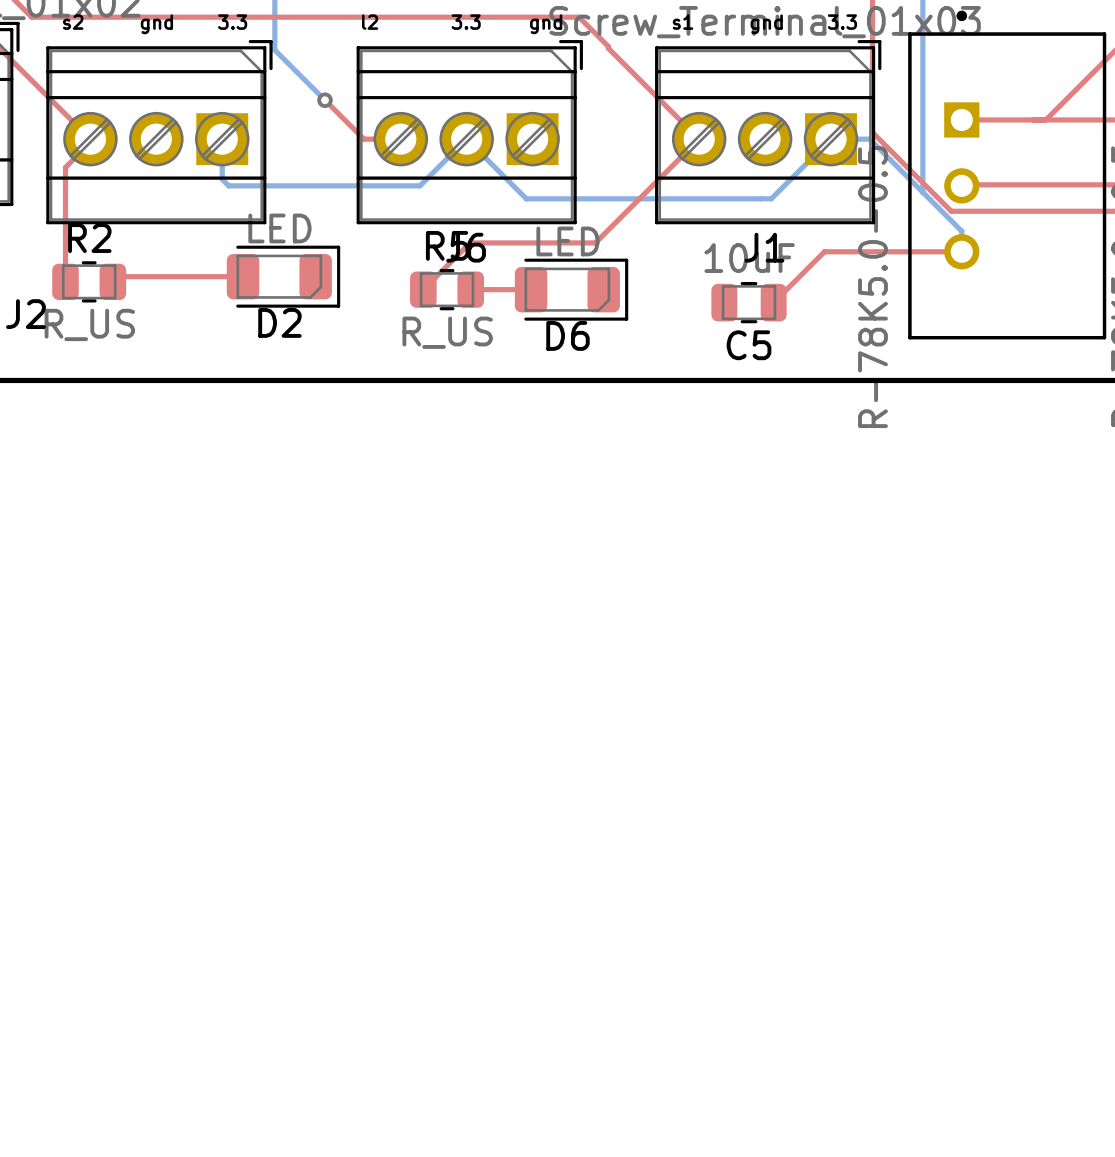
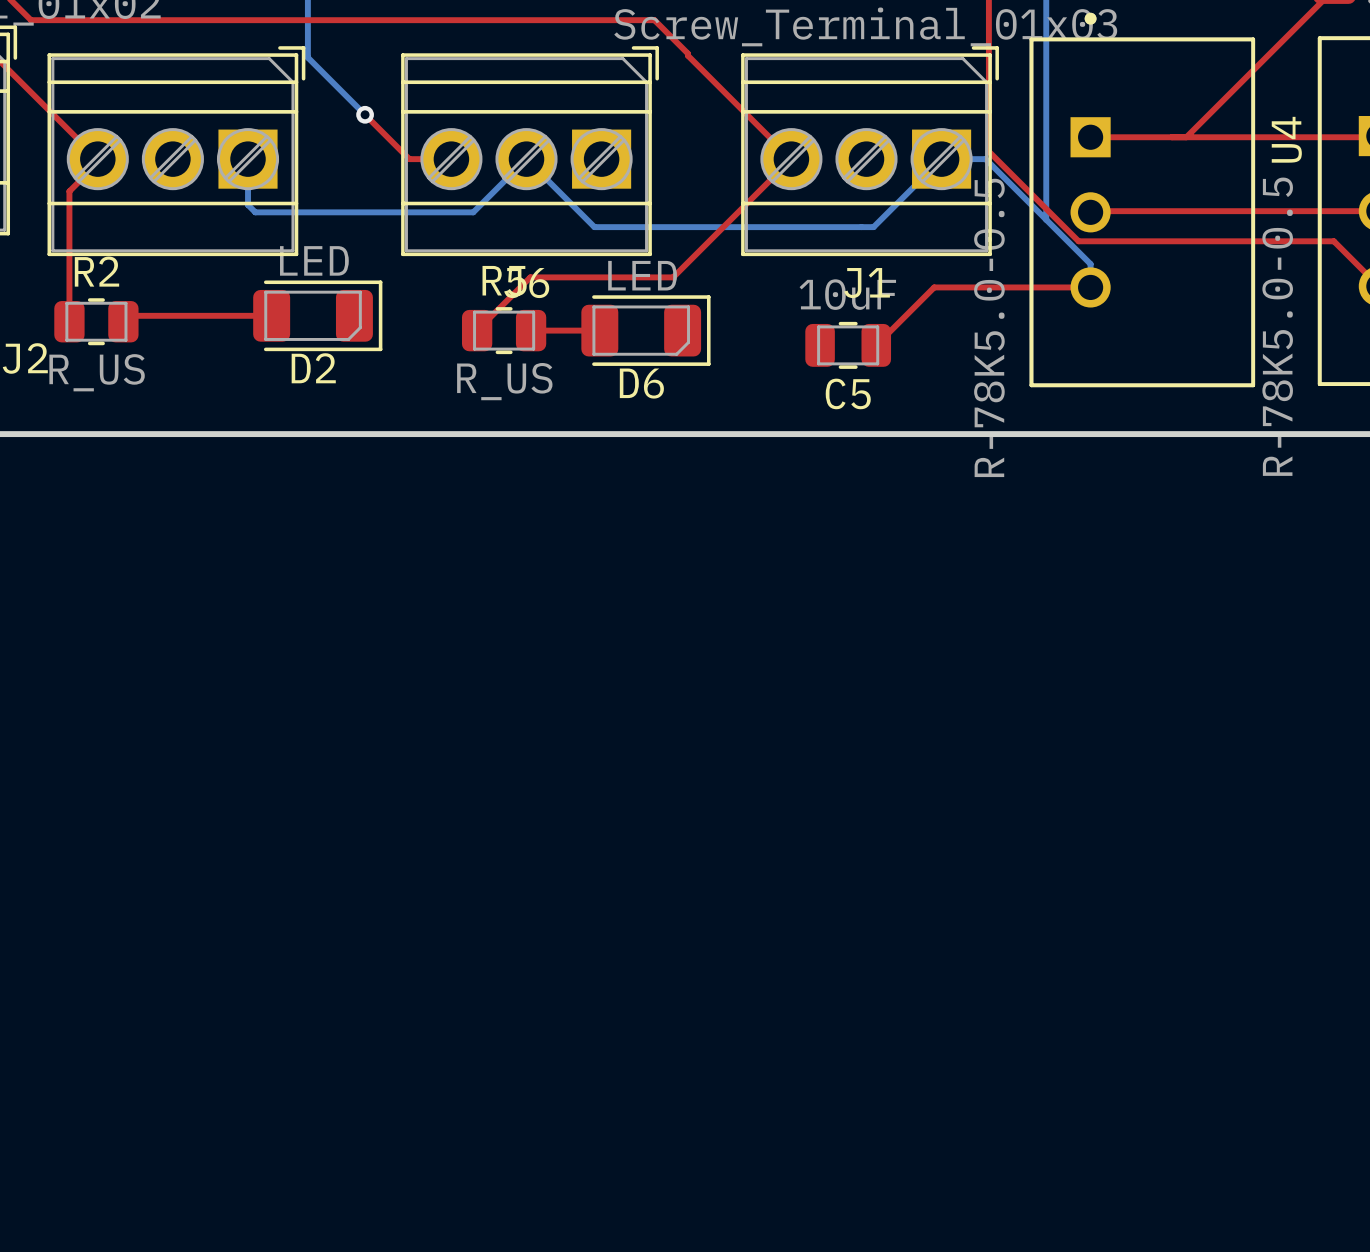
text: s2 (73, 22) -> none
text: 3.3 (232, 22) -> none
text: l2 (370, 22) -> none
text: 3.3 (466, 22) -> none
text: s1 (683, 22) -> none
text: 3.3 (842, 22) -> none
text: gnd (156, 24) -> none
text: gnd (546, 24) -> none
text: gnd (766, 24) -> none

